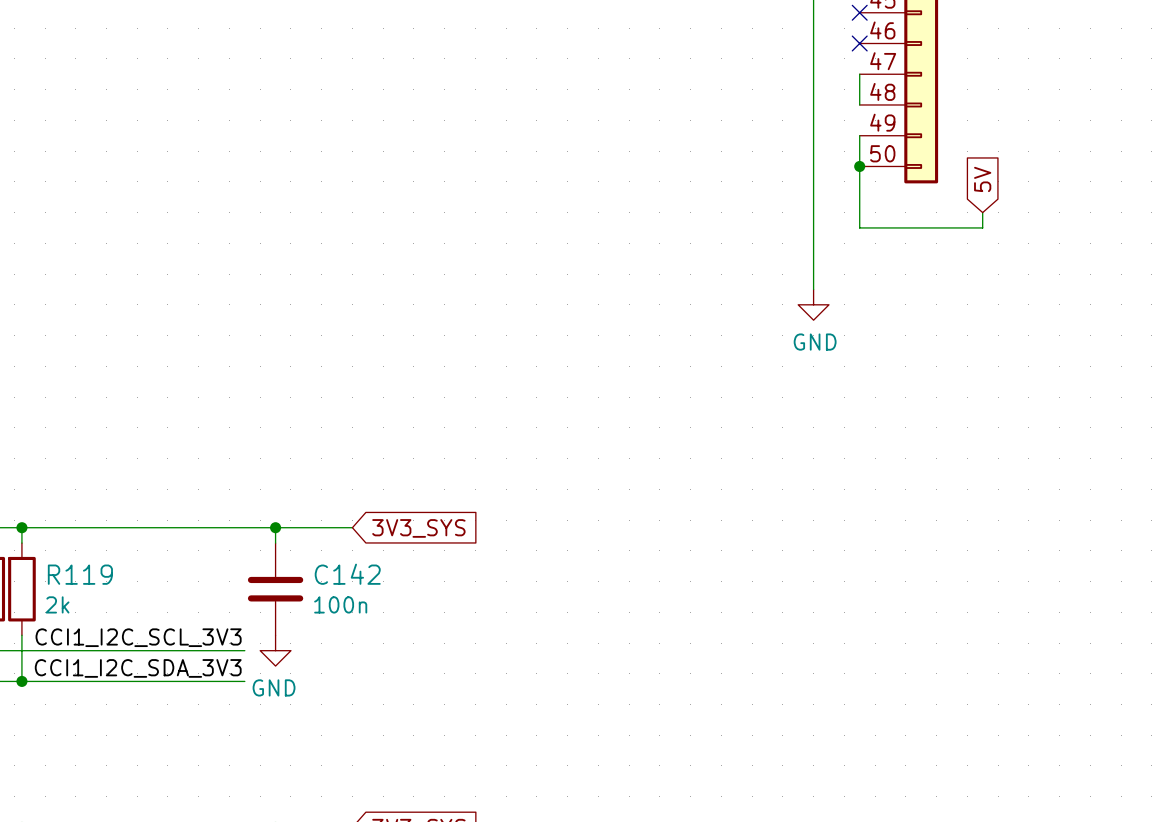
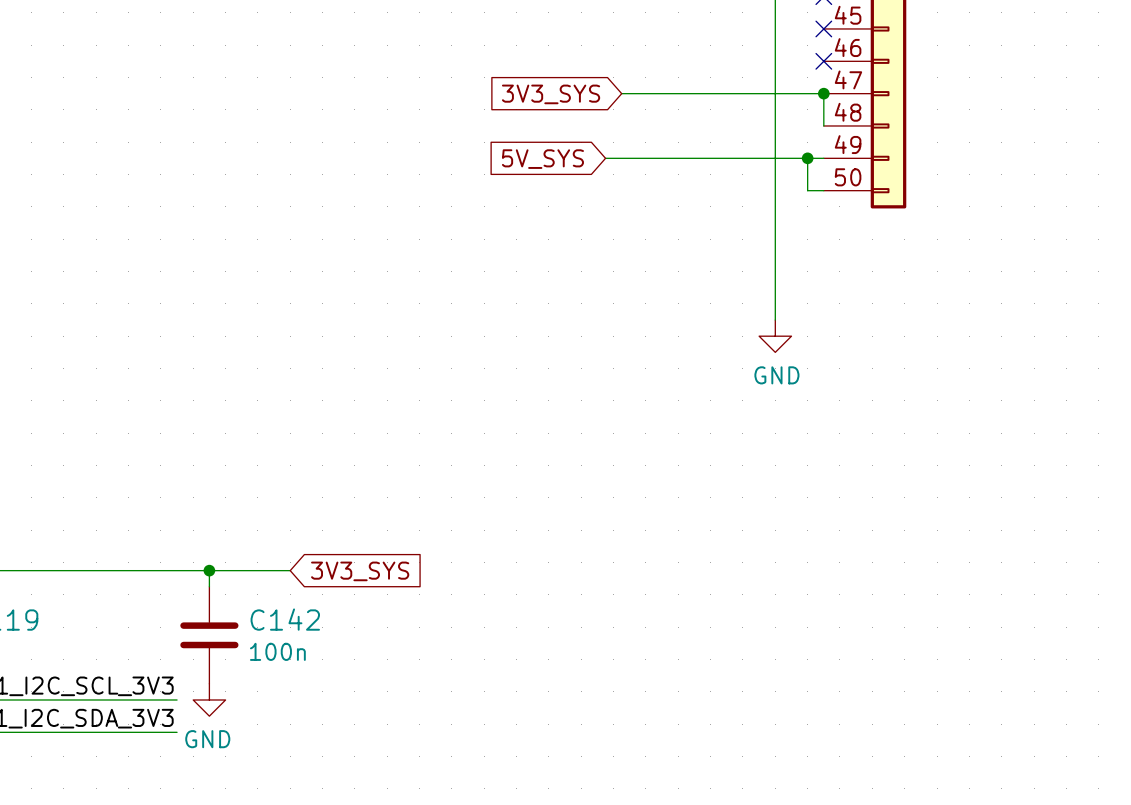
global label: none -> 3V3_SYS (551, 94)
wire: none -> (621, 93) (823, 93)
junction: none -> (823, 93)
wire: none -> (807, 158) (807, 190) (823, 190)
wire: (859, 135) (859, 227) (982, 227) (982, 212) -> (823, 158) (605, 158)
global label: none -> 5V_SYS (542, 159)
junction position: (859, 166) -> (807, 158)
global label: 5V (982, 179) -> none

